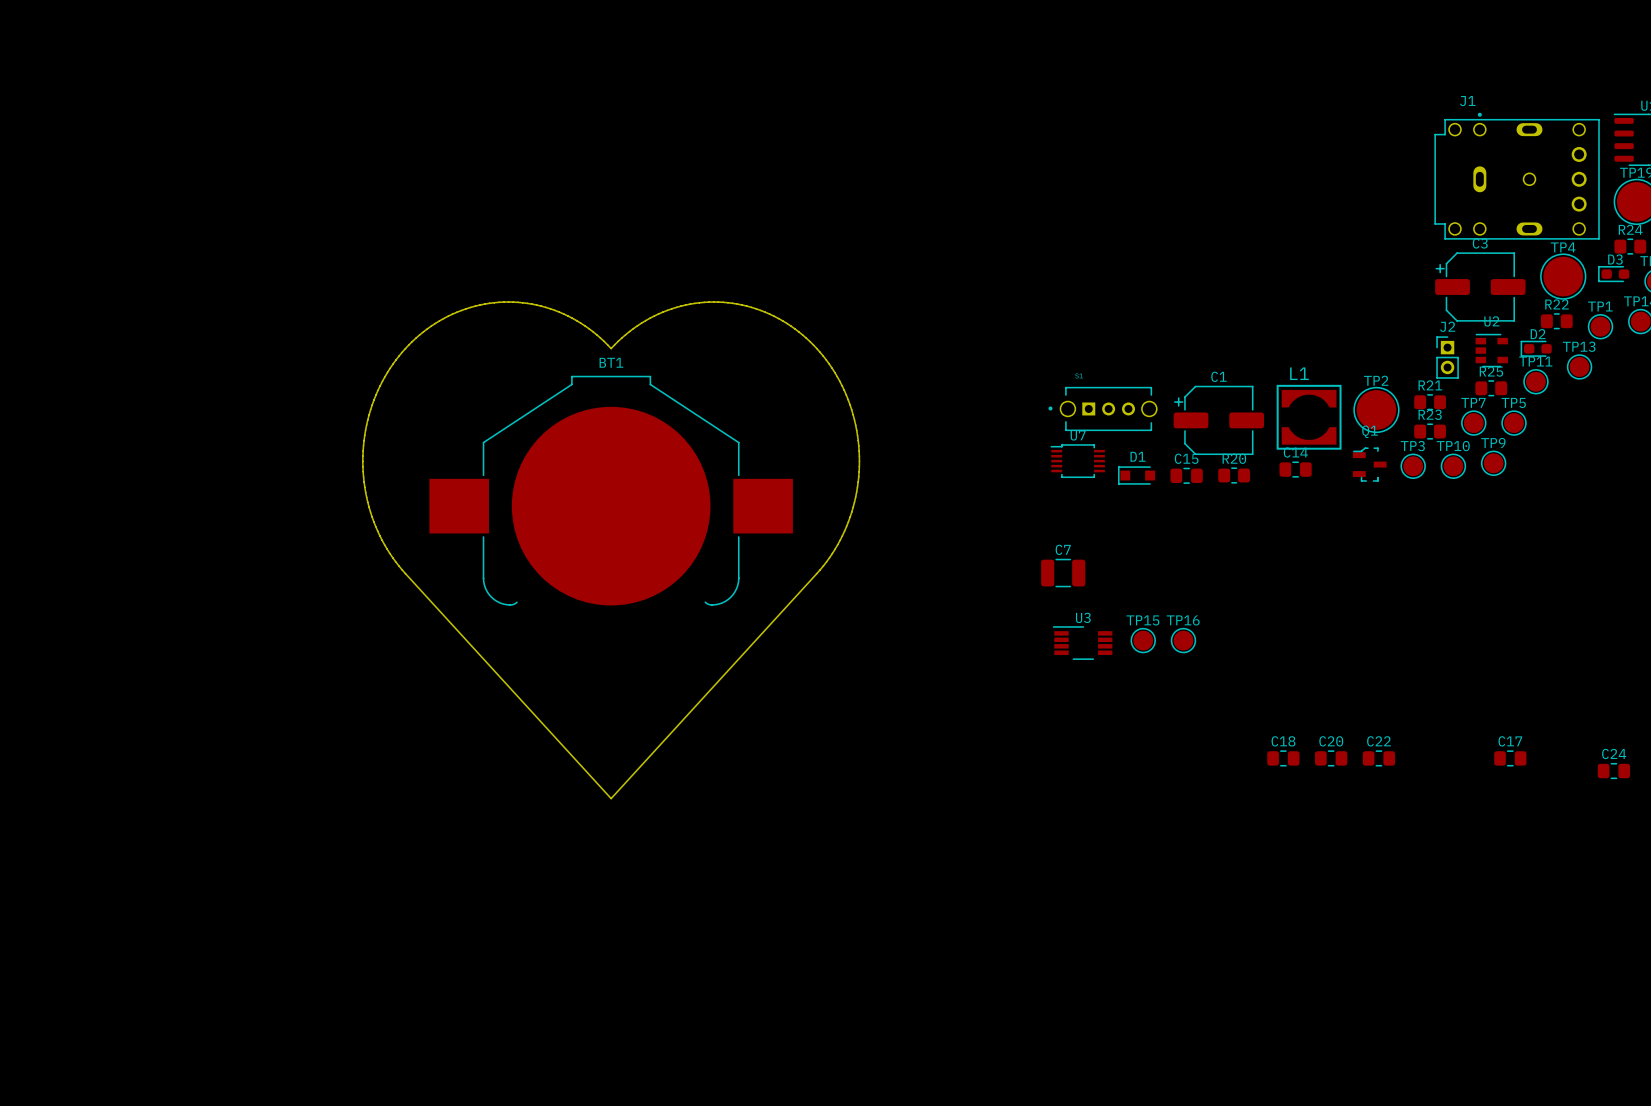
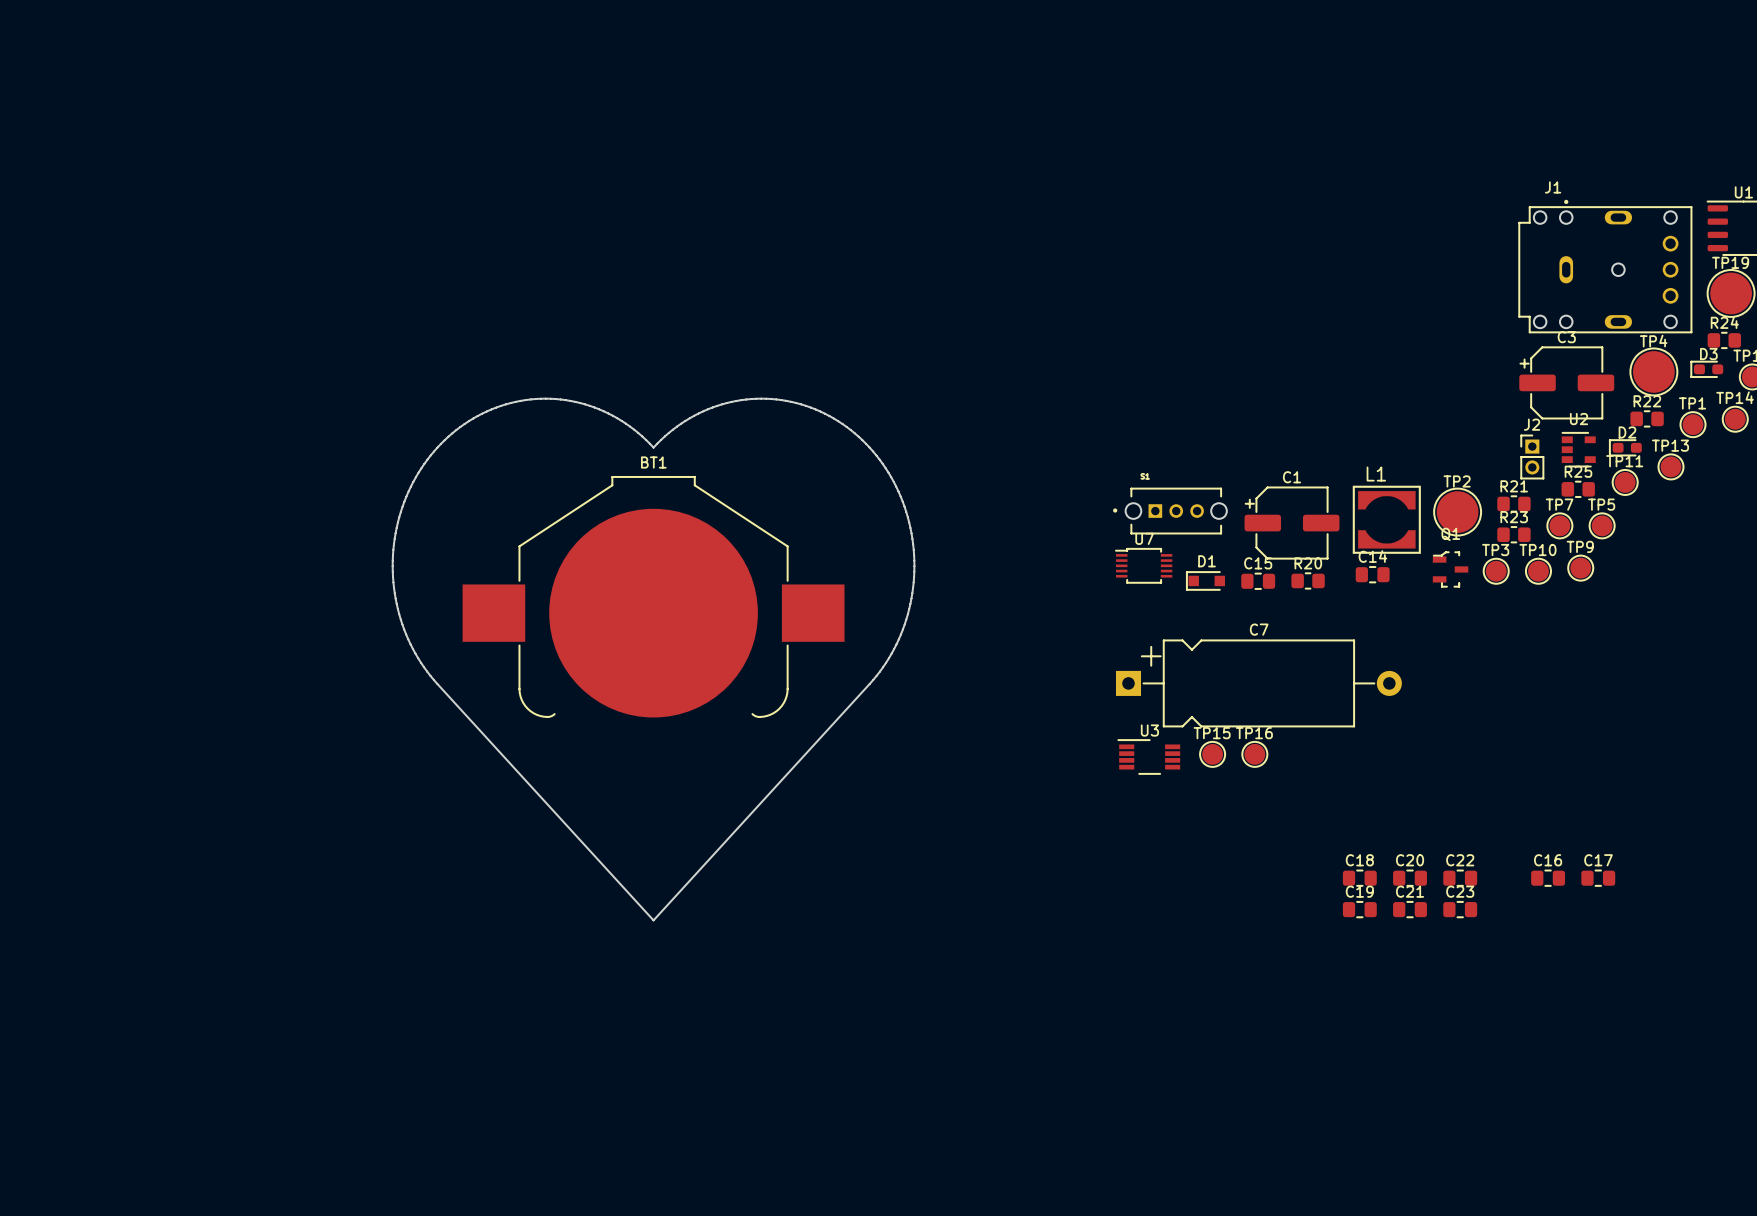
C7 name position: C7 (1063, 549) -> C7 (1259, 629)
C7 footprint: [1041, 558, 1086, 588] -> [1115, 639, 1402, 728]
C16: none -> (1548, 878)
C24: (1613, 771) -> none
C19: none -> (1359, 909)
C21: none -> (1410, 909)
C23: none -> (1460, 909)

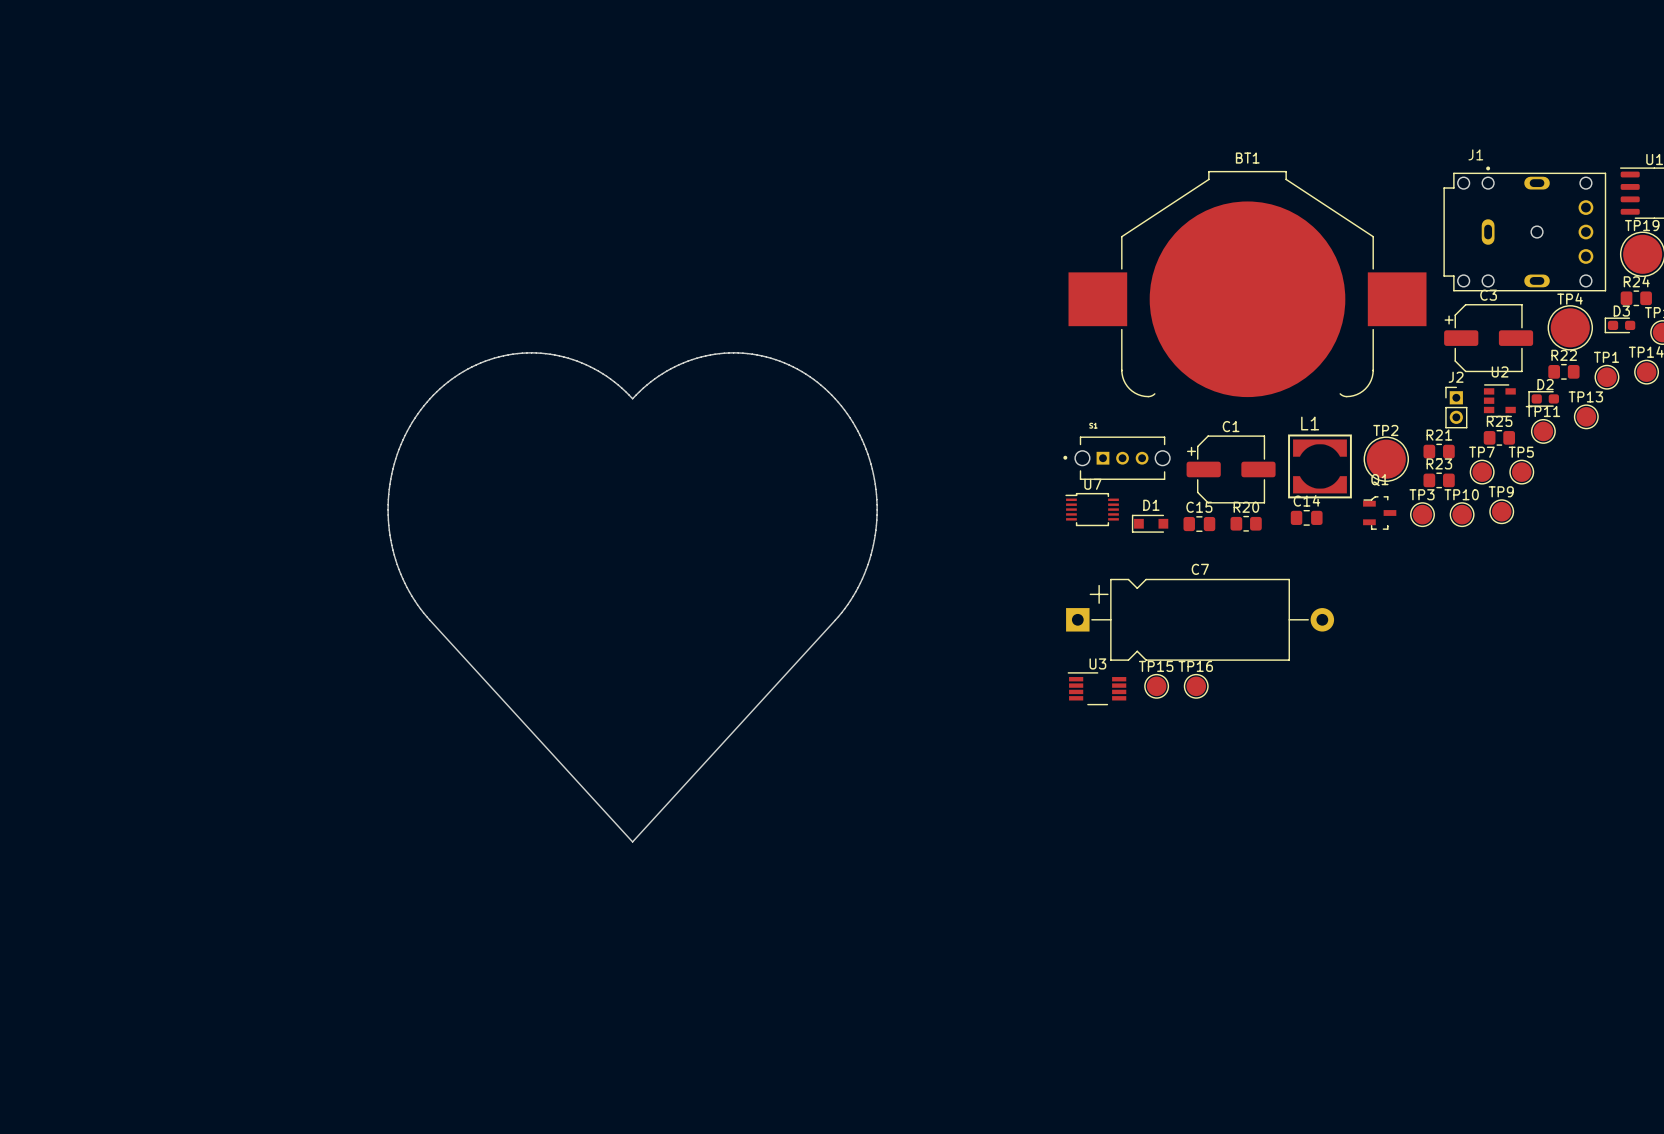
BT1 position: (653, 596) -> (1247, 284)
C18: (1359, 878) -> none
C20: (1410, 878) -> none
C22: (1460, 878) -> none
C16: (1548, 878) -> none
C17: (1598, 878) -> none
C19: (1359, 909) -> none
C21: (1410, 909) -> none
C23: (1460, 909) -> none

